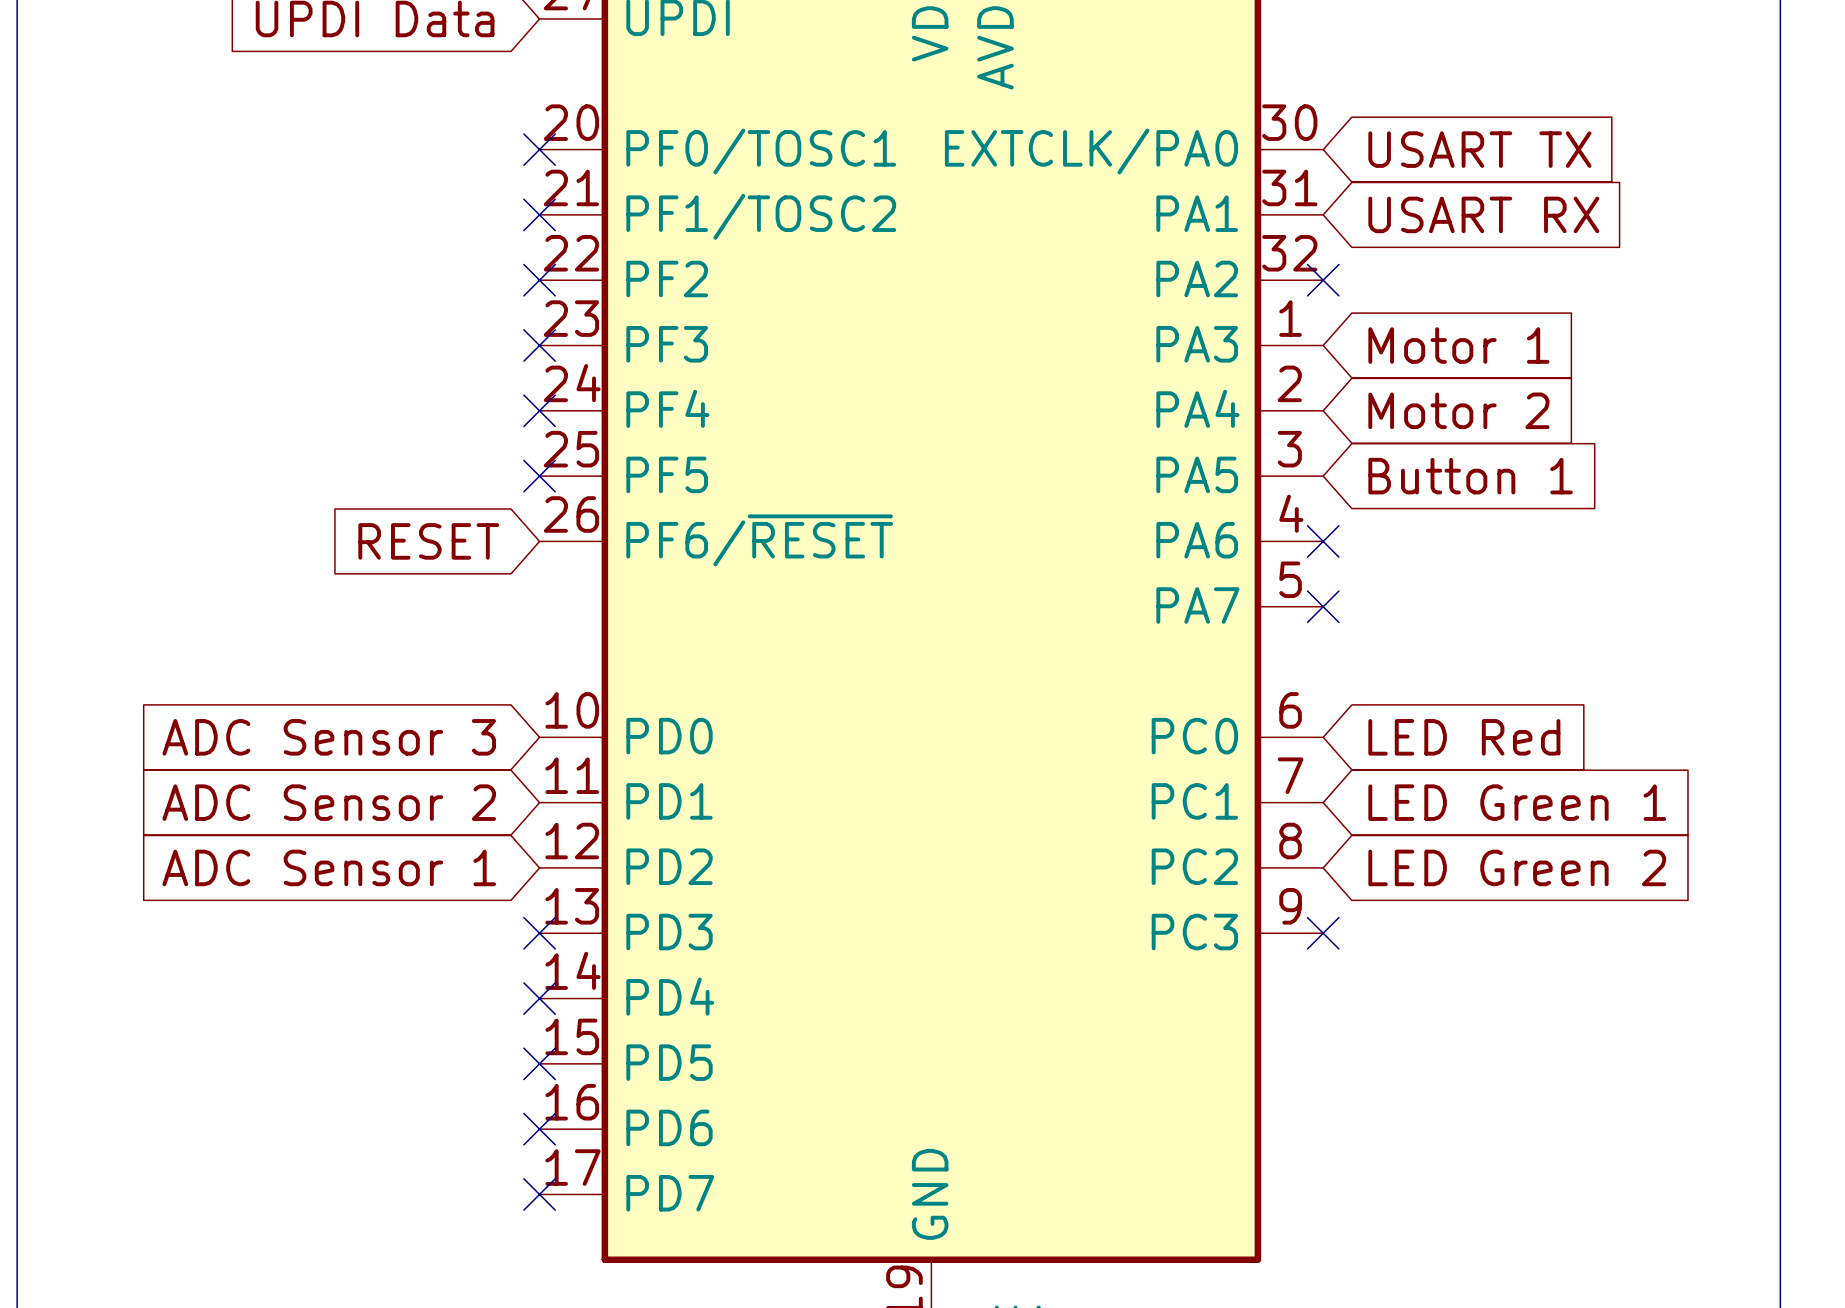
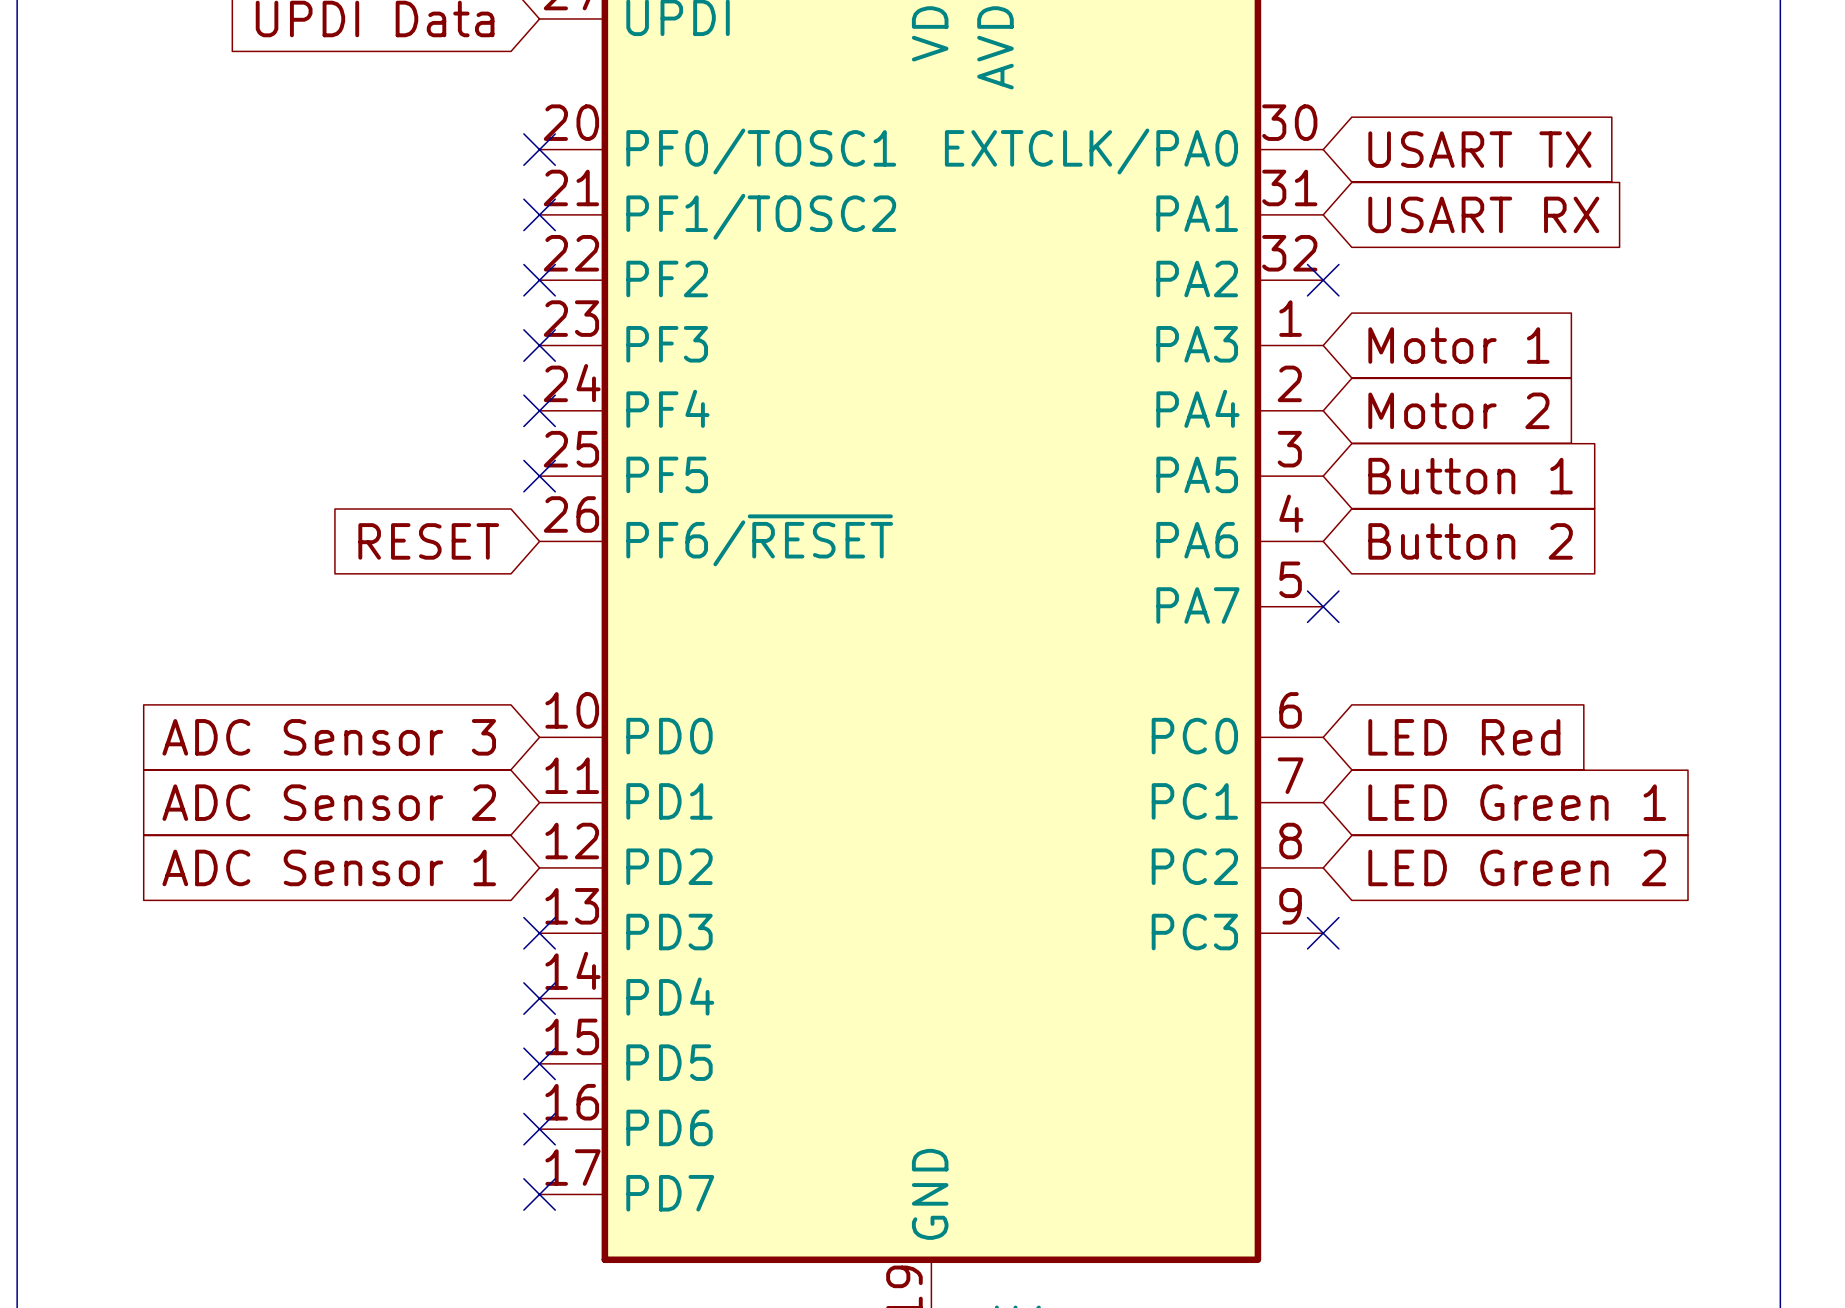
no-connect mark: (1323, 541) -> none
global label: none -> Button 2 (1470, 541)

